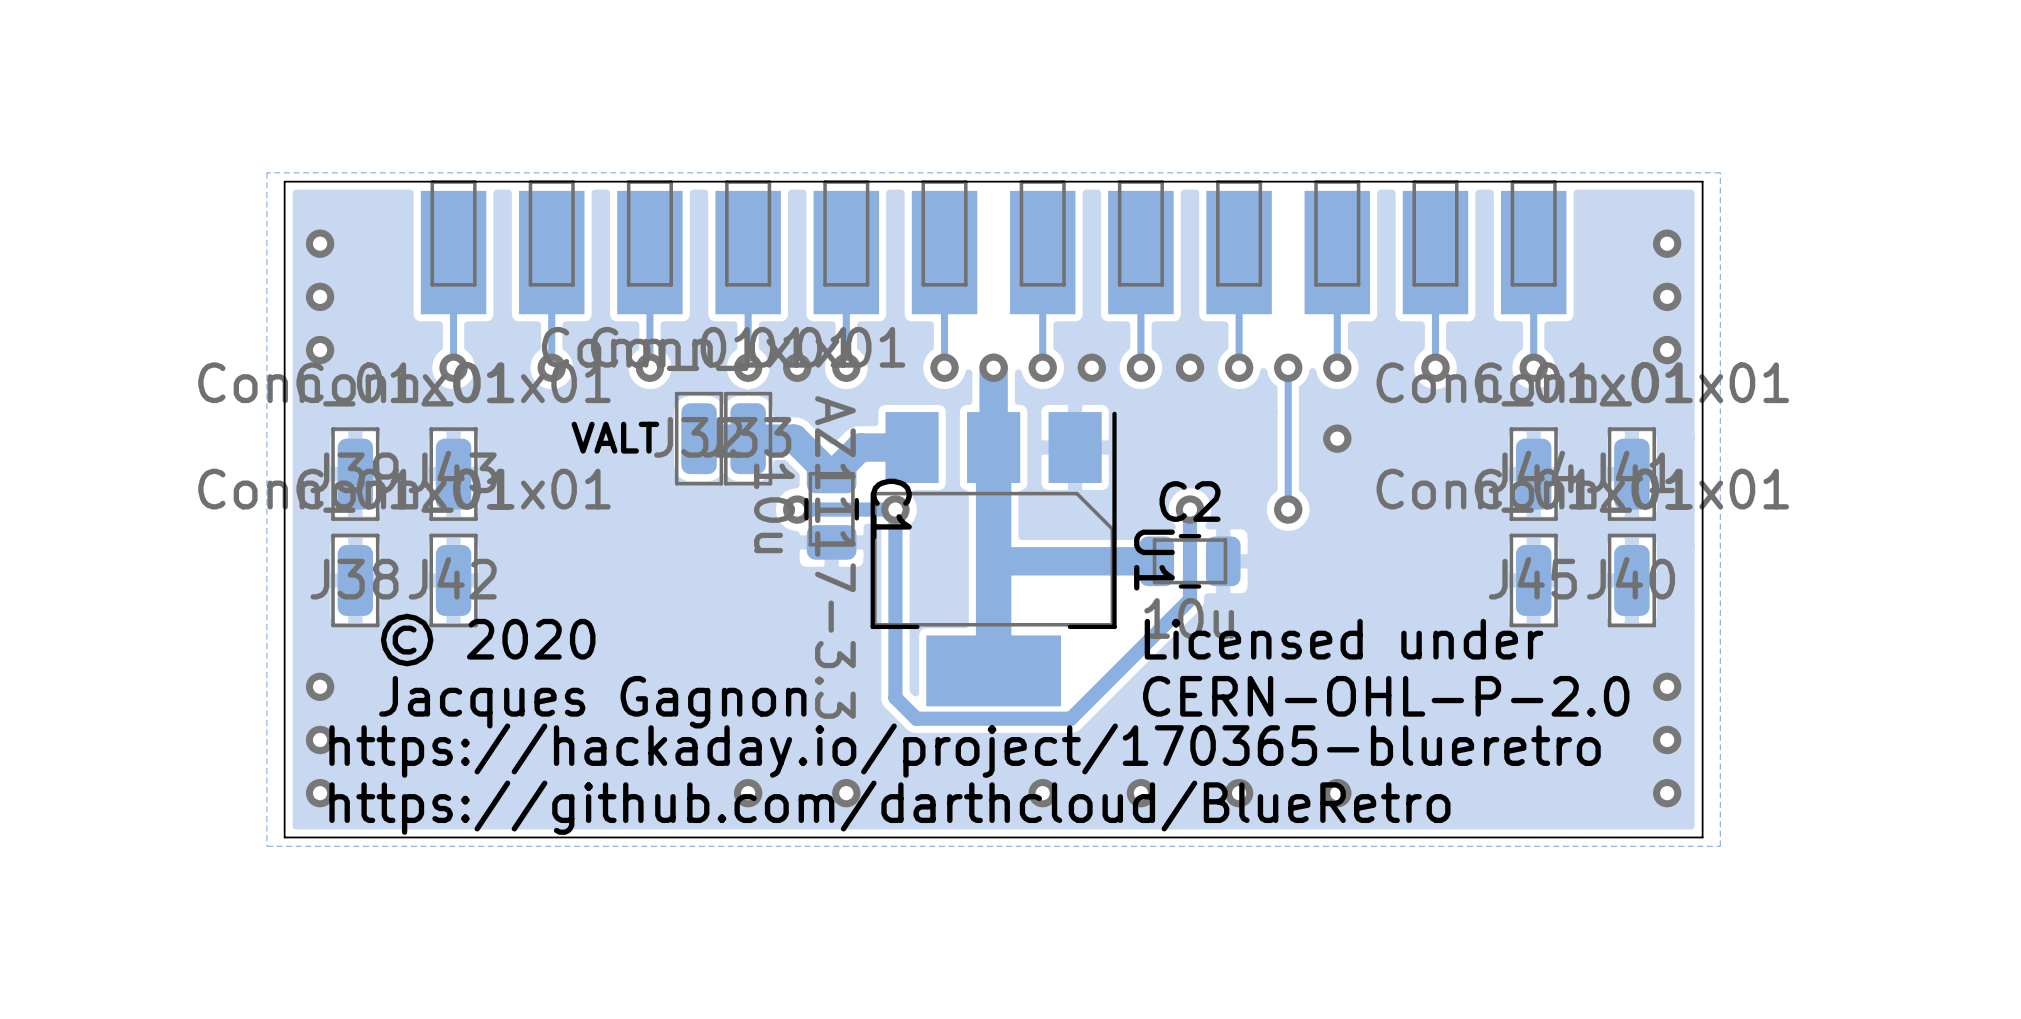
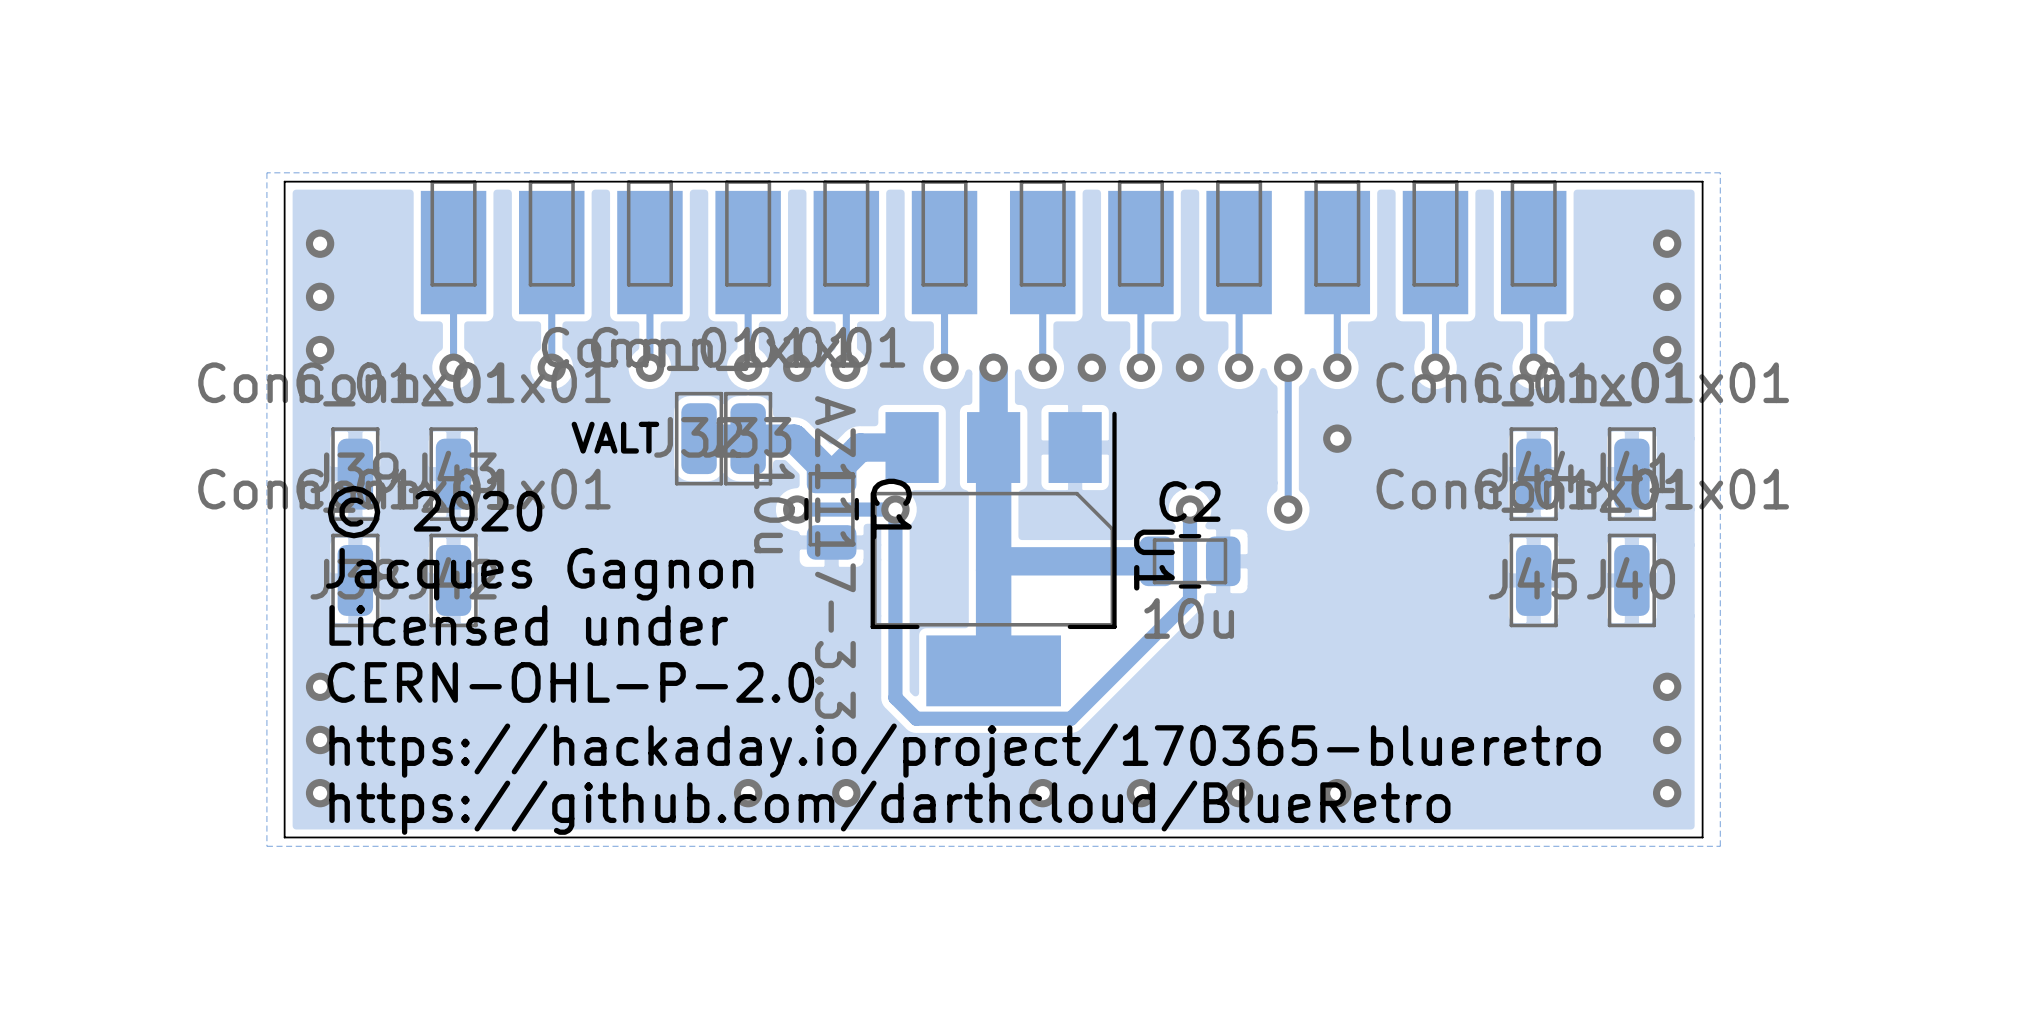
text position: Licensed under (1344, 639) -> Licensed under (528, 625)
text position: © 2020 (488, 640) -> © 2020 (435, 512)
text position: CERN-OHL-P-2.0 (1386, 696) -> CERN-OHL-P-2.0 (570, 682)
text position: Jacques Gagnon (592, 702) -> Jacques Gagnon (539, 574)

